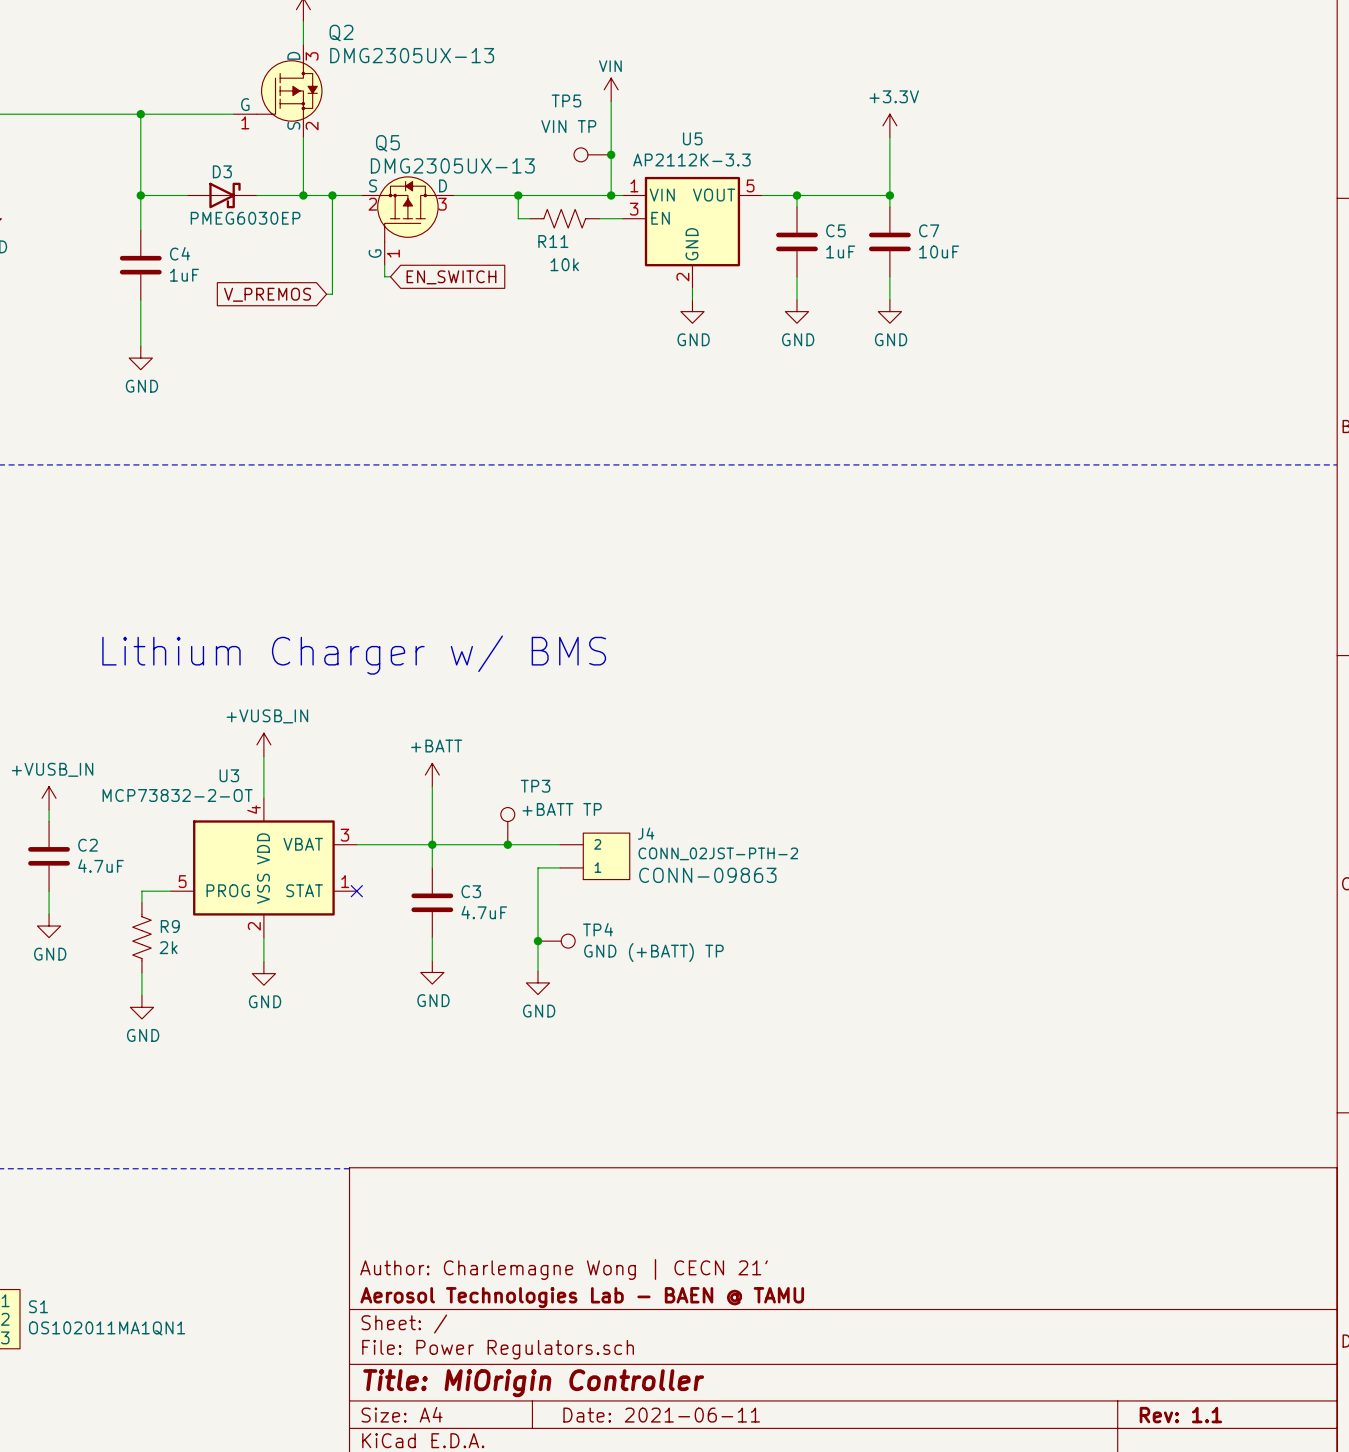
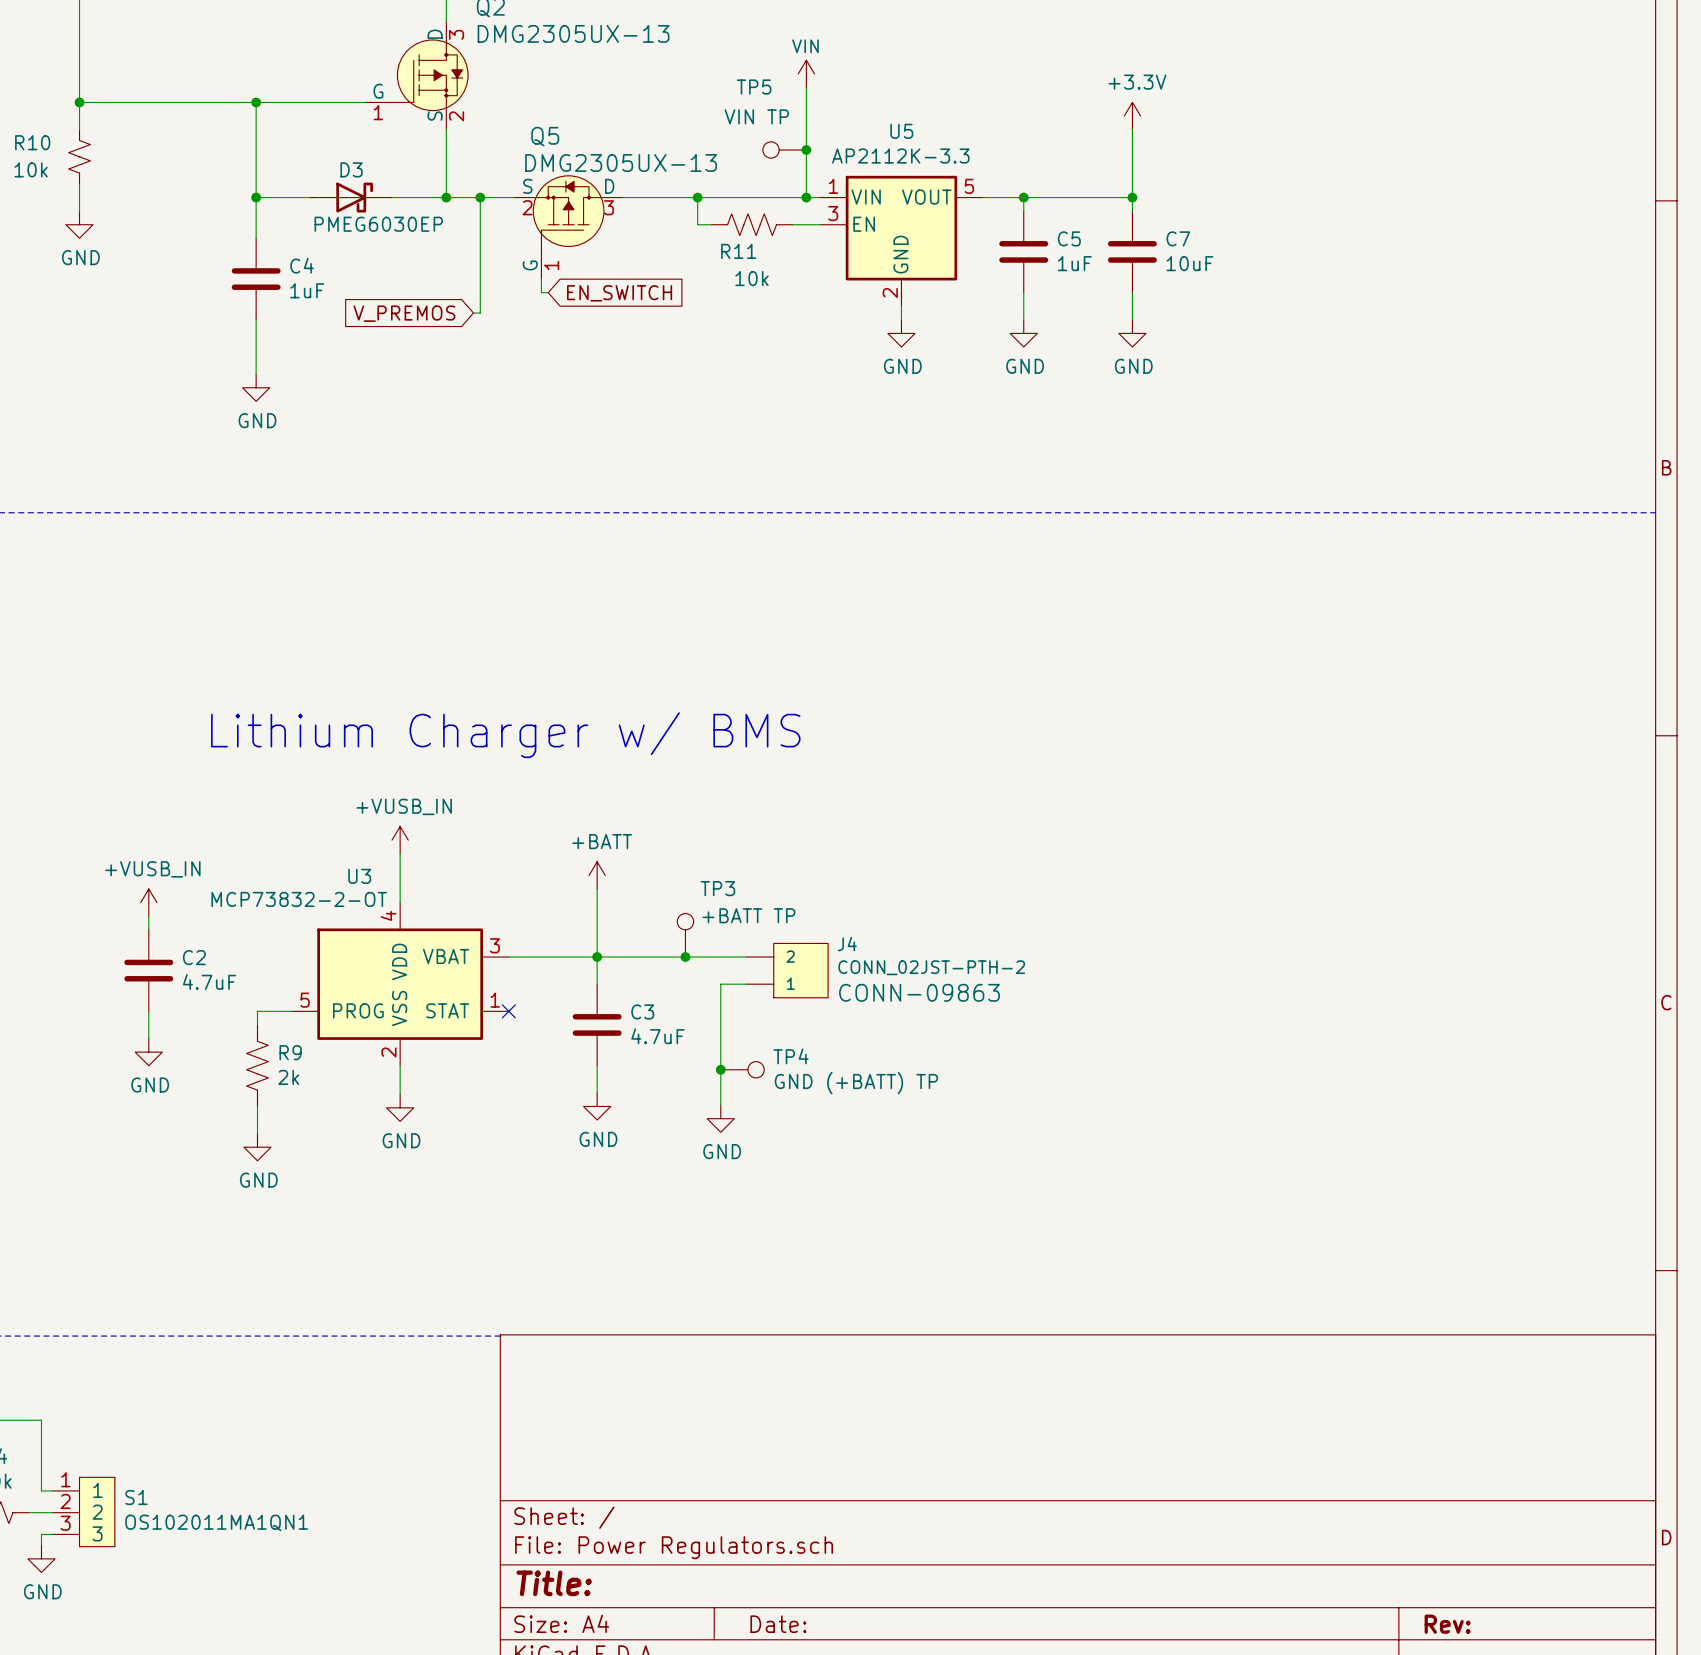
title block: Author: Charlemagne Wong | CECN 21' (564, 1269) -> none
title block: Aerosol Technologies Lab - BAEN @ TAMU (582, 1297) -> none
title block: Title: MiOrigin Controller (533, 1383) -> Title: (554, 1583)
title block: Date: 2021-06-11 (661, 1415) -> Date: (778, 1624)
title block: Rev: 1.1 (1180, 1415) -> Rev: (1447, 1624)

